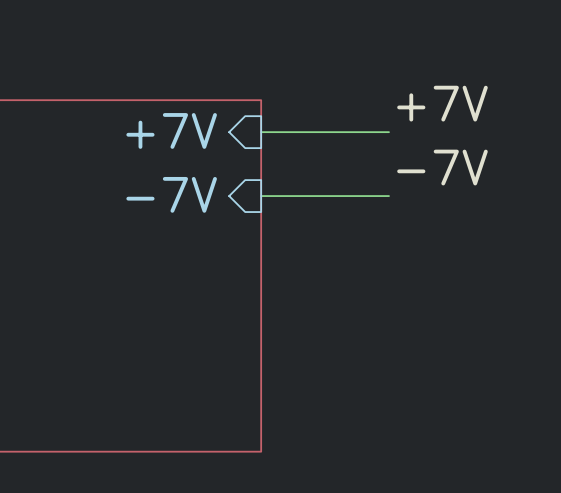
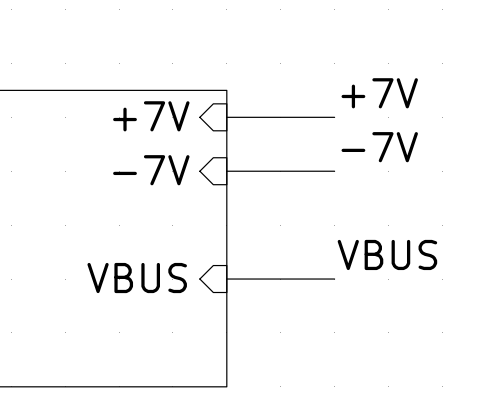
label: none -> VBUS (387, 254)
sheet pin: none -> VBUS (137, 278)
wire: none -> (226, 279) (334, 279)

